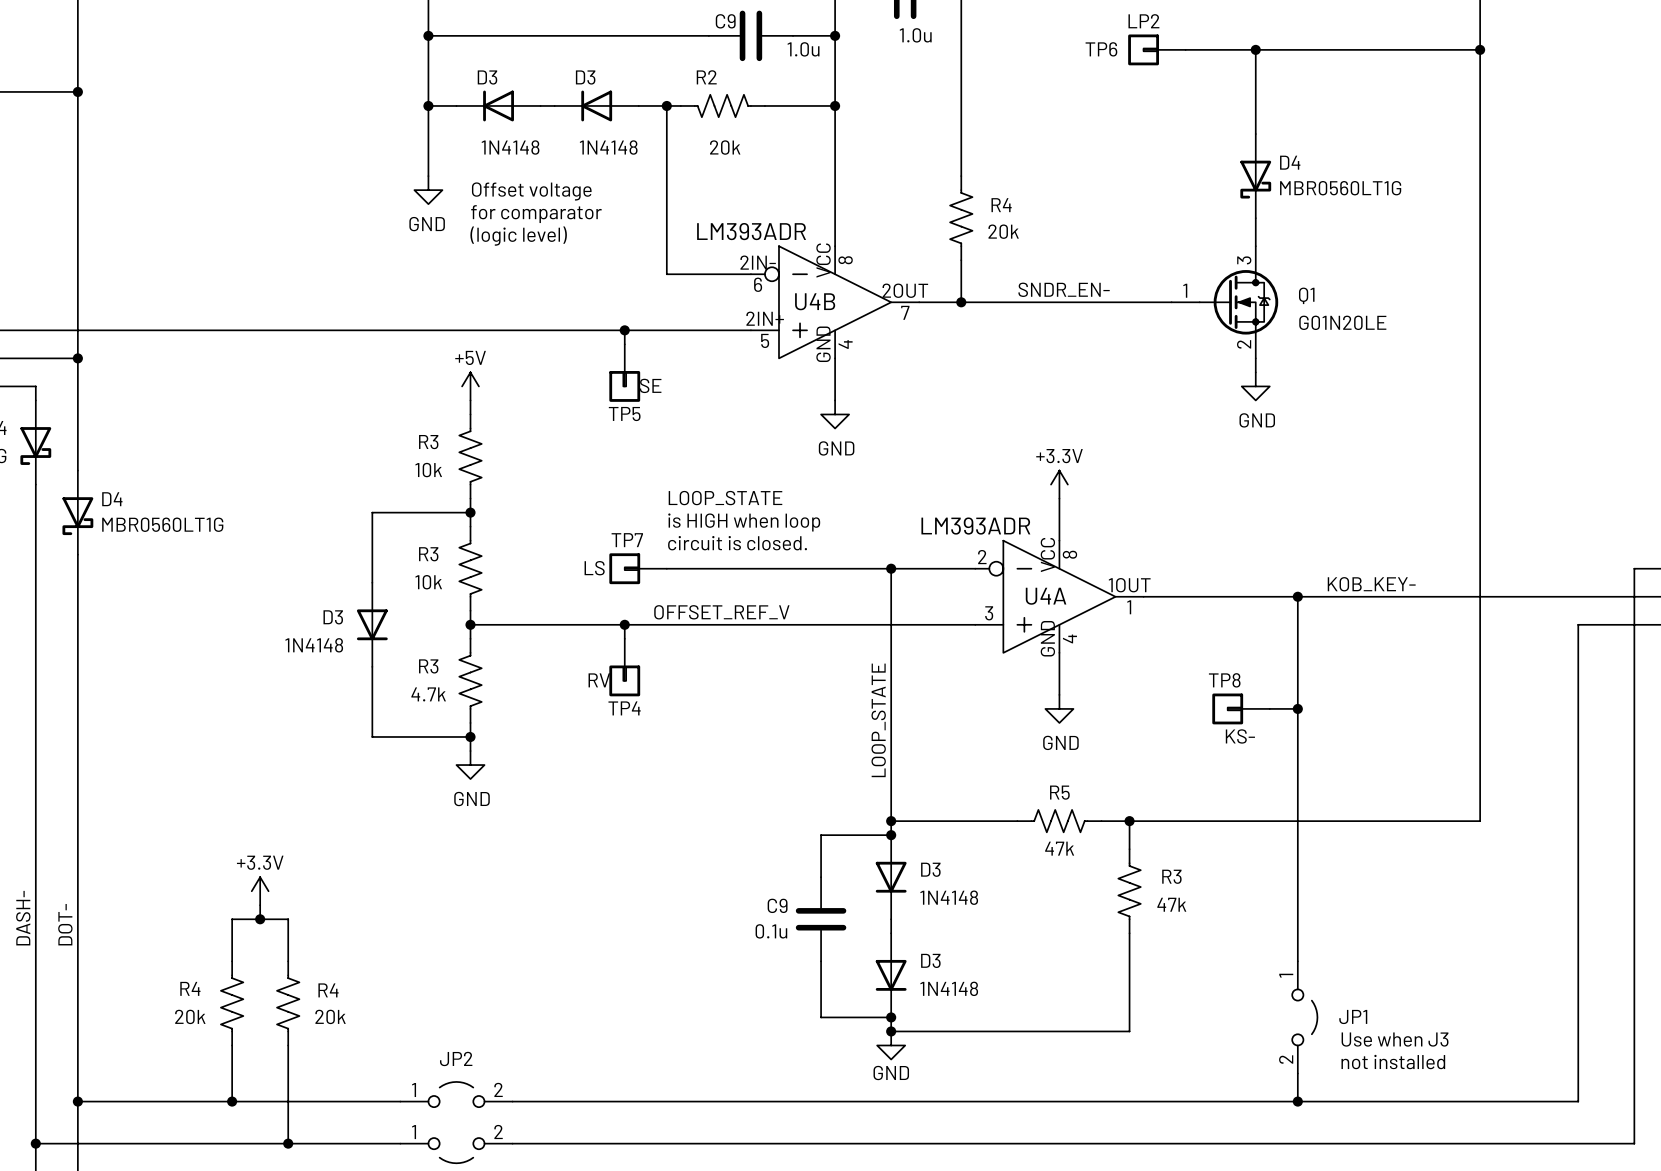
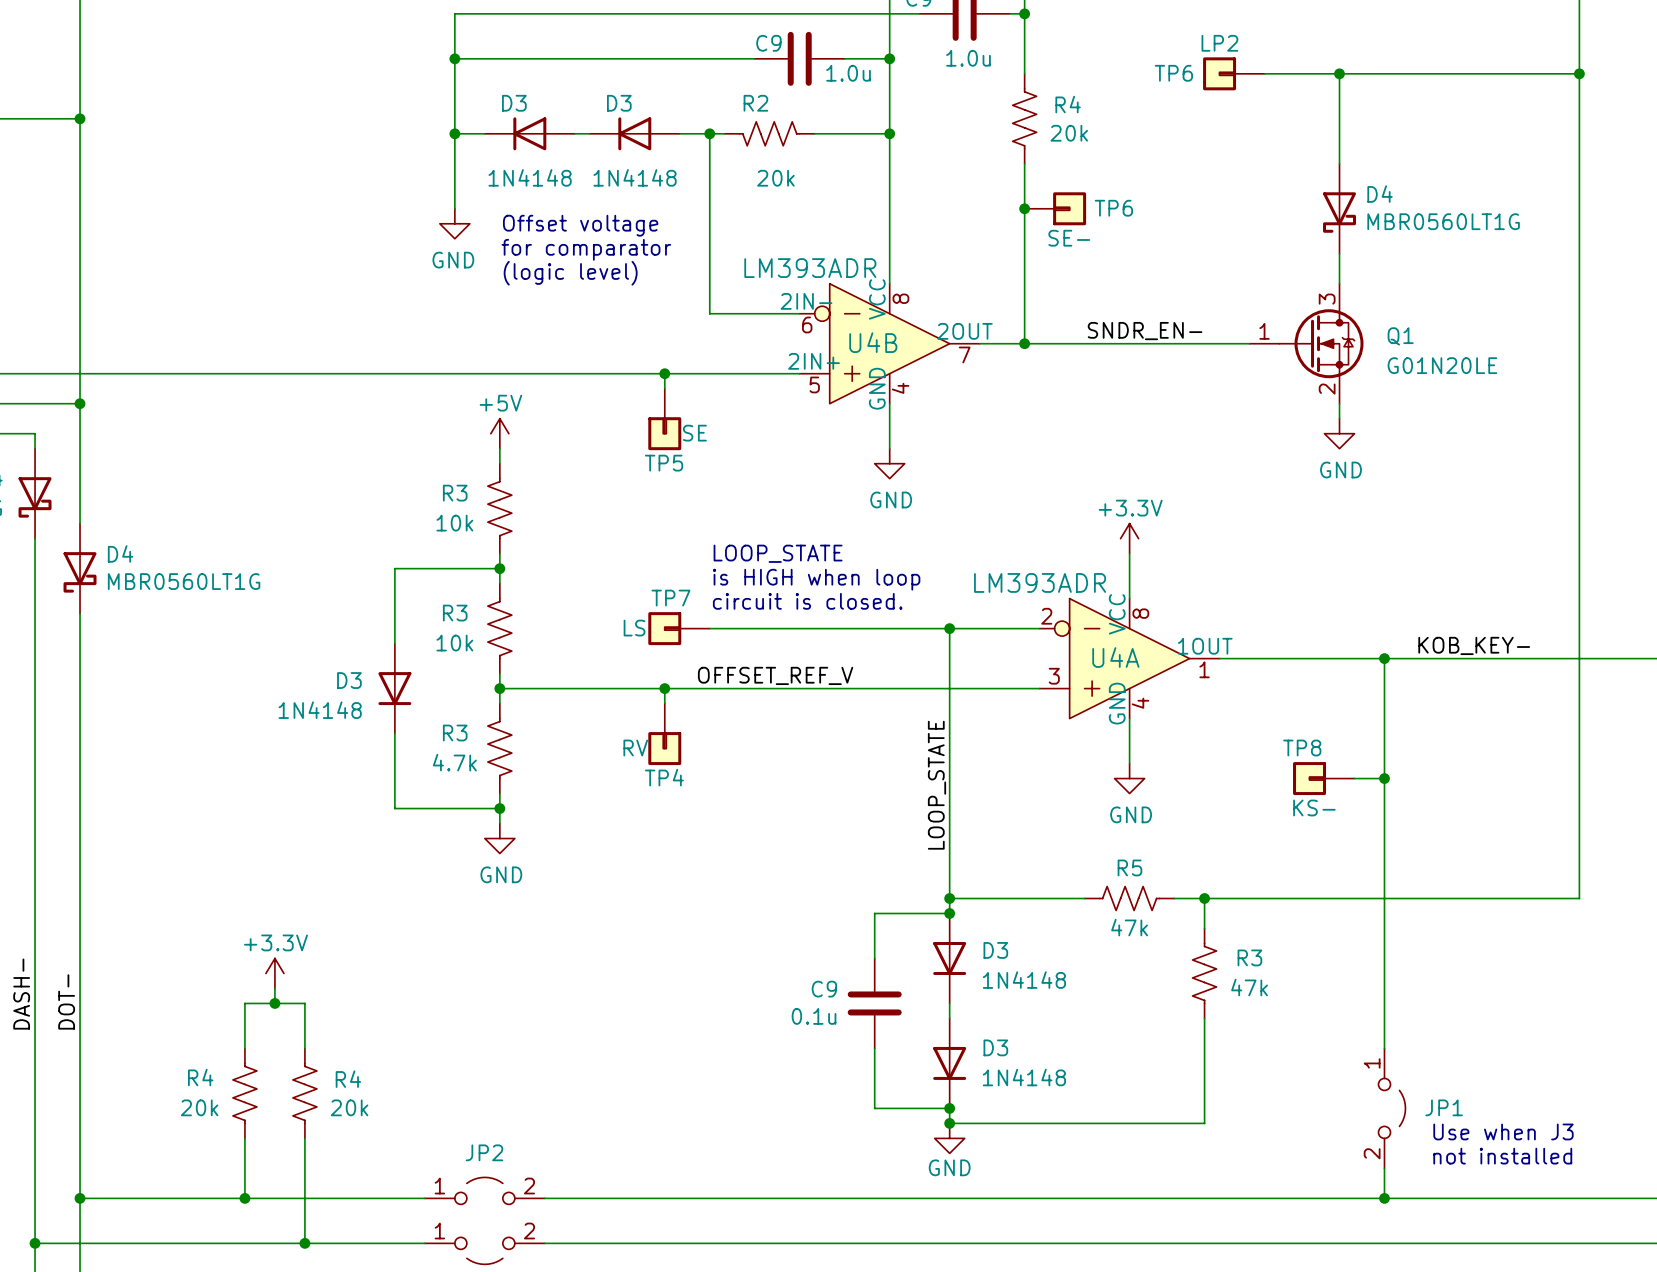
junction: none -> (1024, 208)
TP6: none -> SE- (1055, 208)
R4 position: (961, 218) -> (1024, 118)

